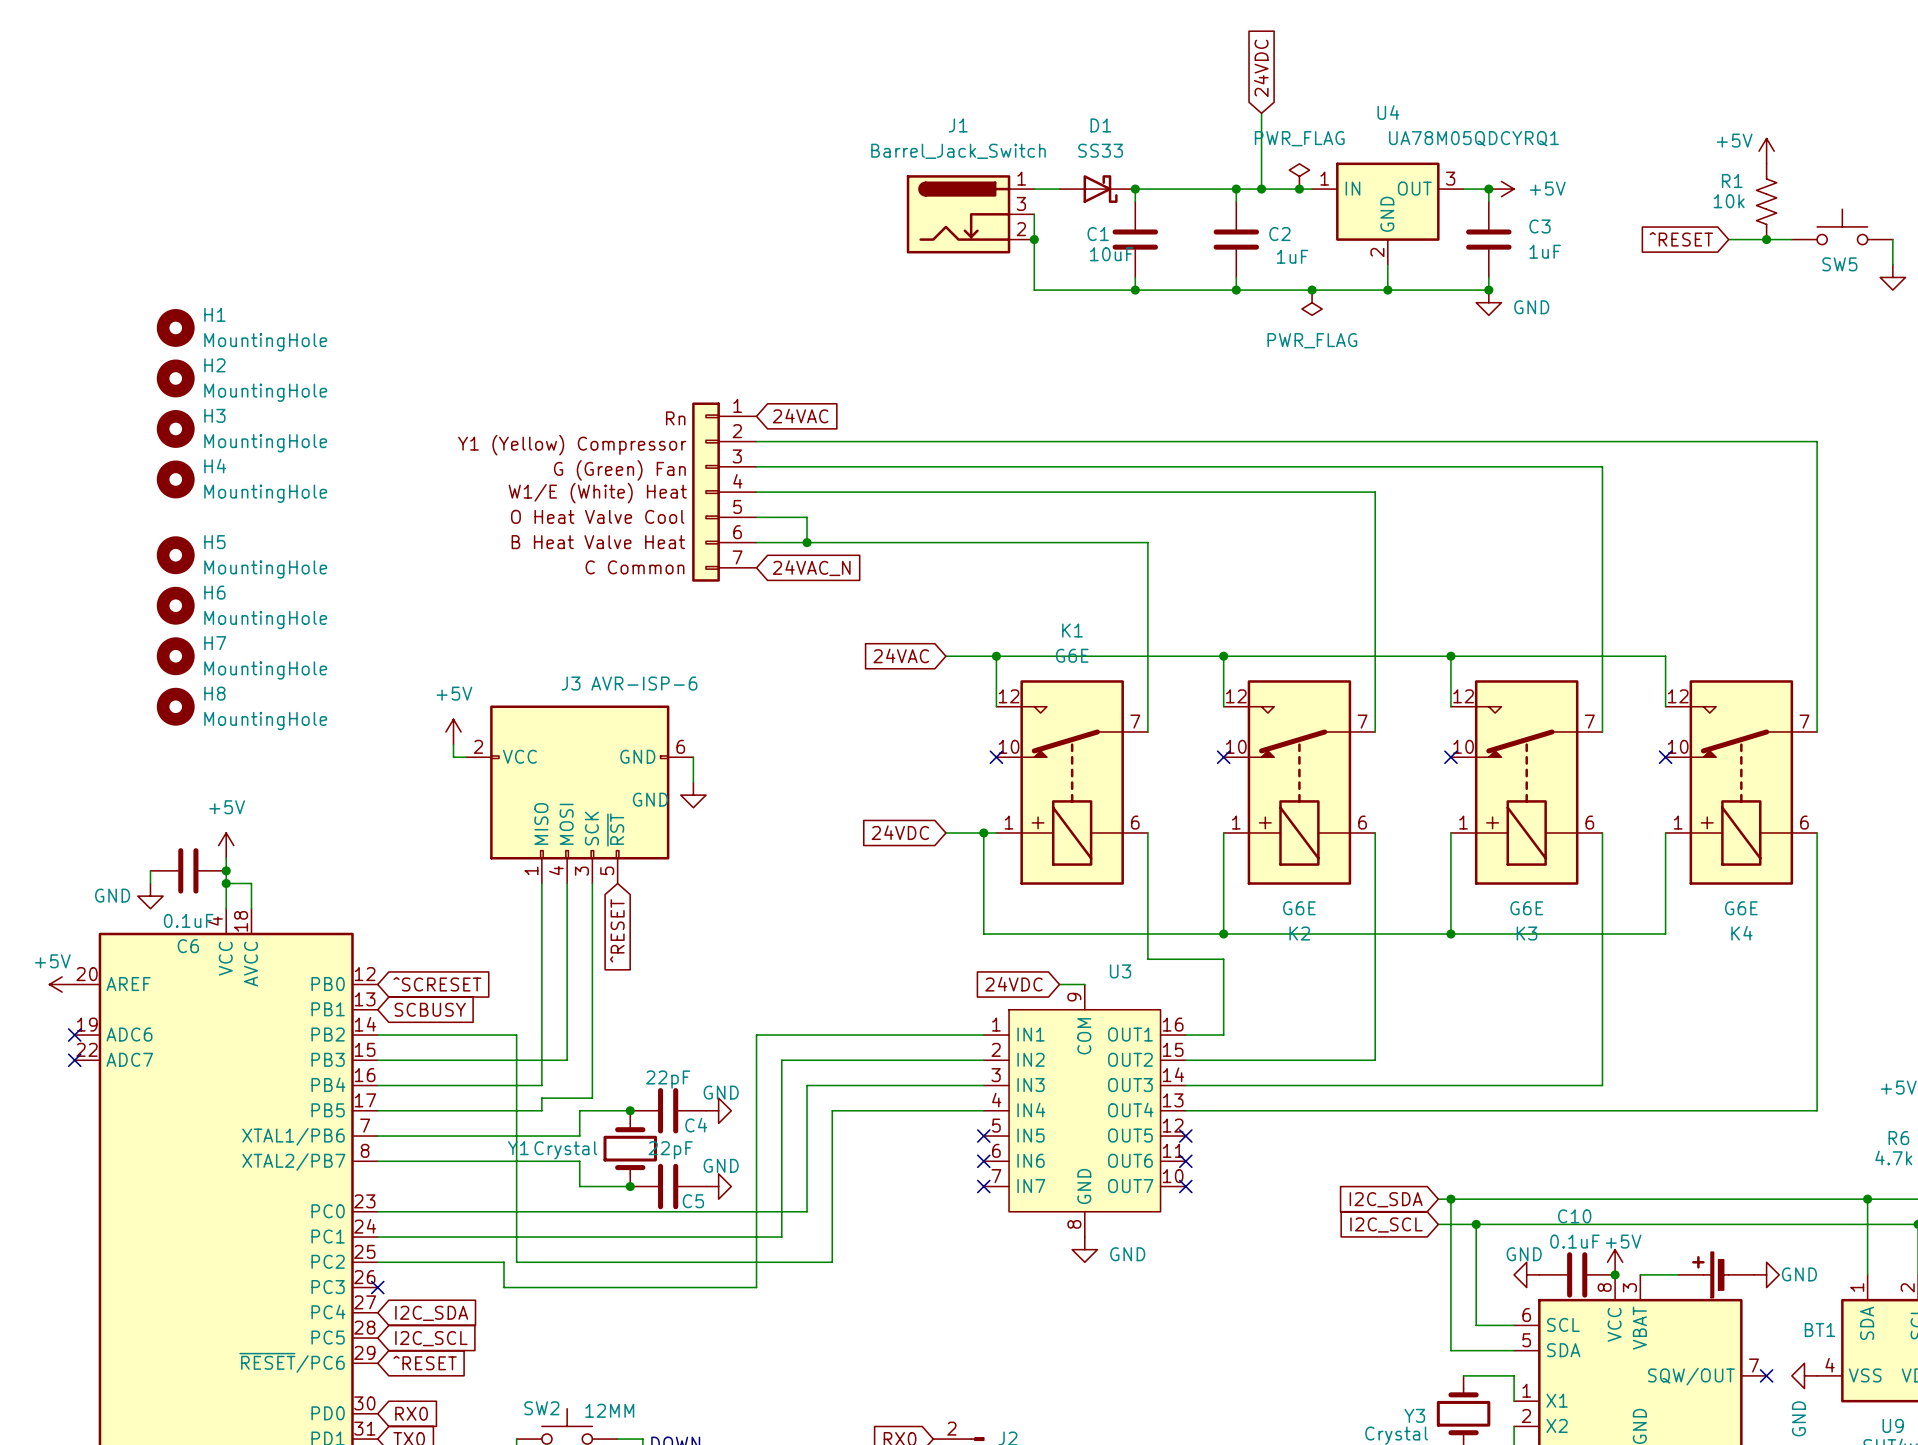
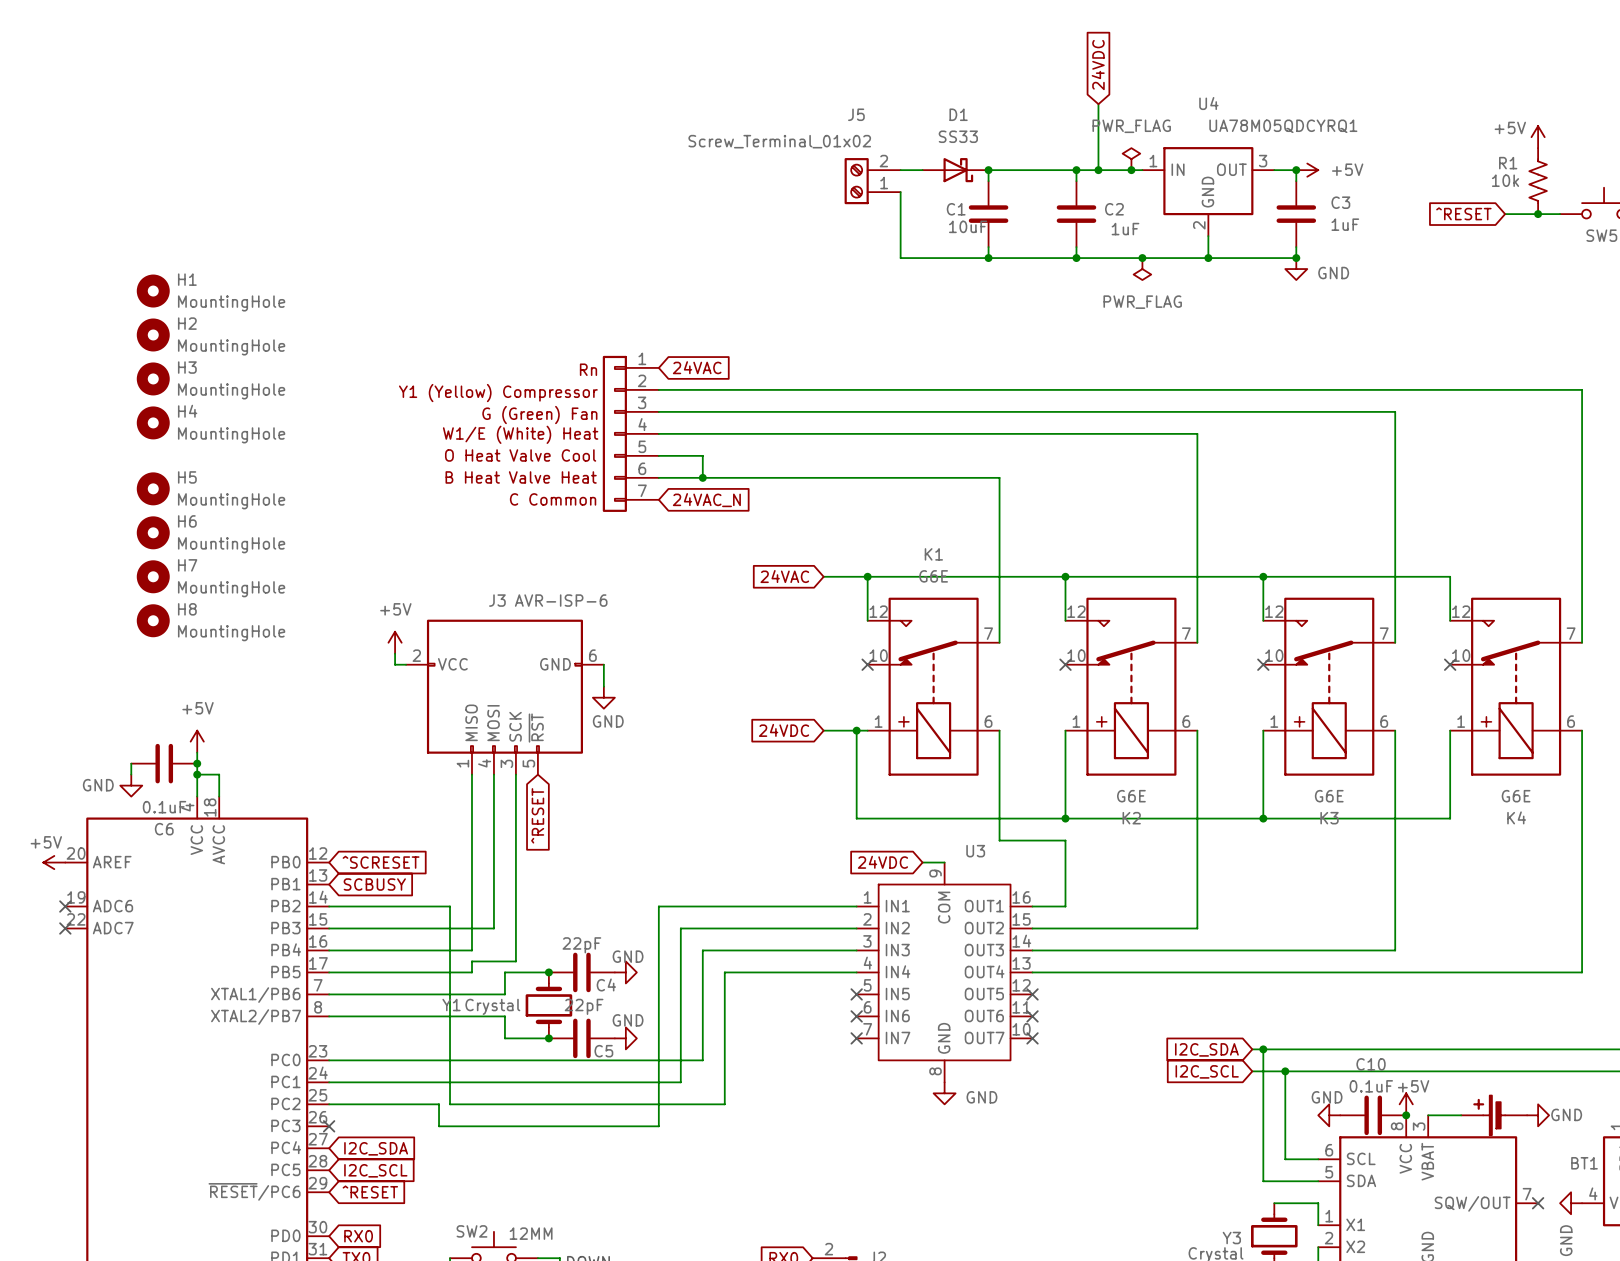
J5: none -> Screw_Terminal_01x02 (872, 181)
J1: Barrel_Jack_Switch (970, 214) -> none
junction: (1034, 239) -> none
power symbol text position: GND (650, 799) -> GND (608, 721)

